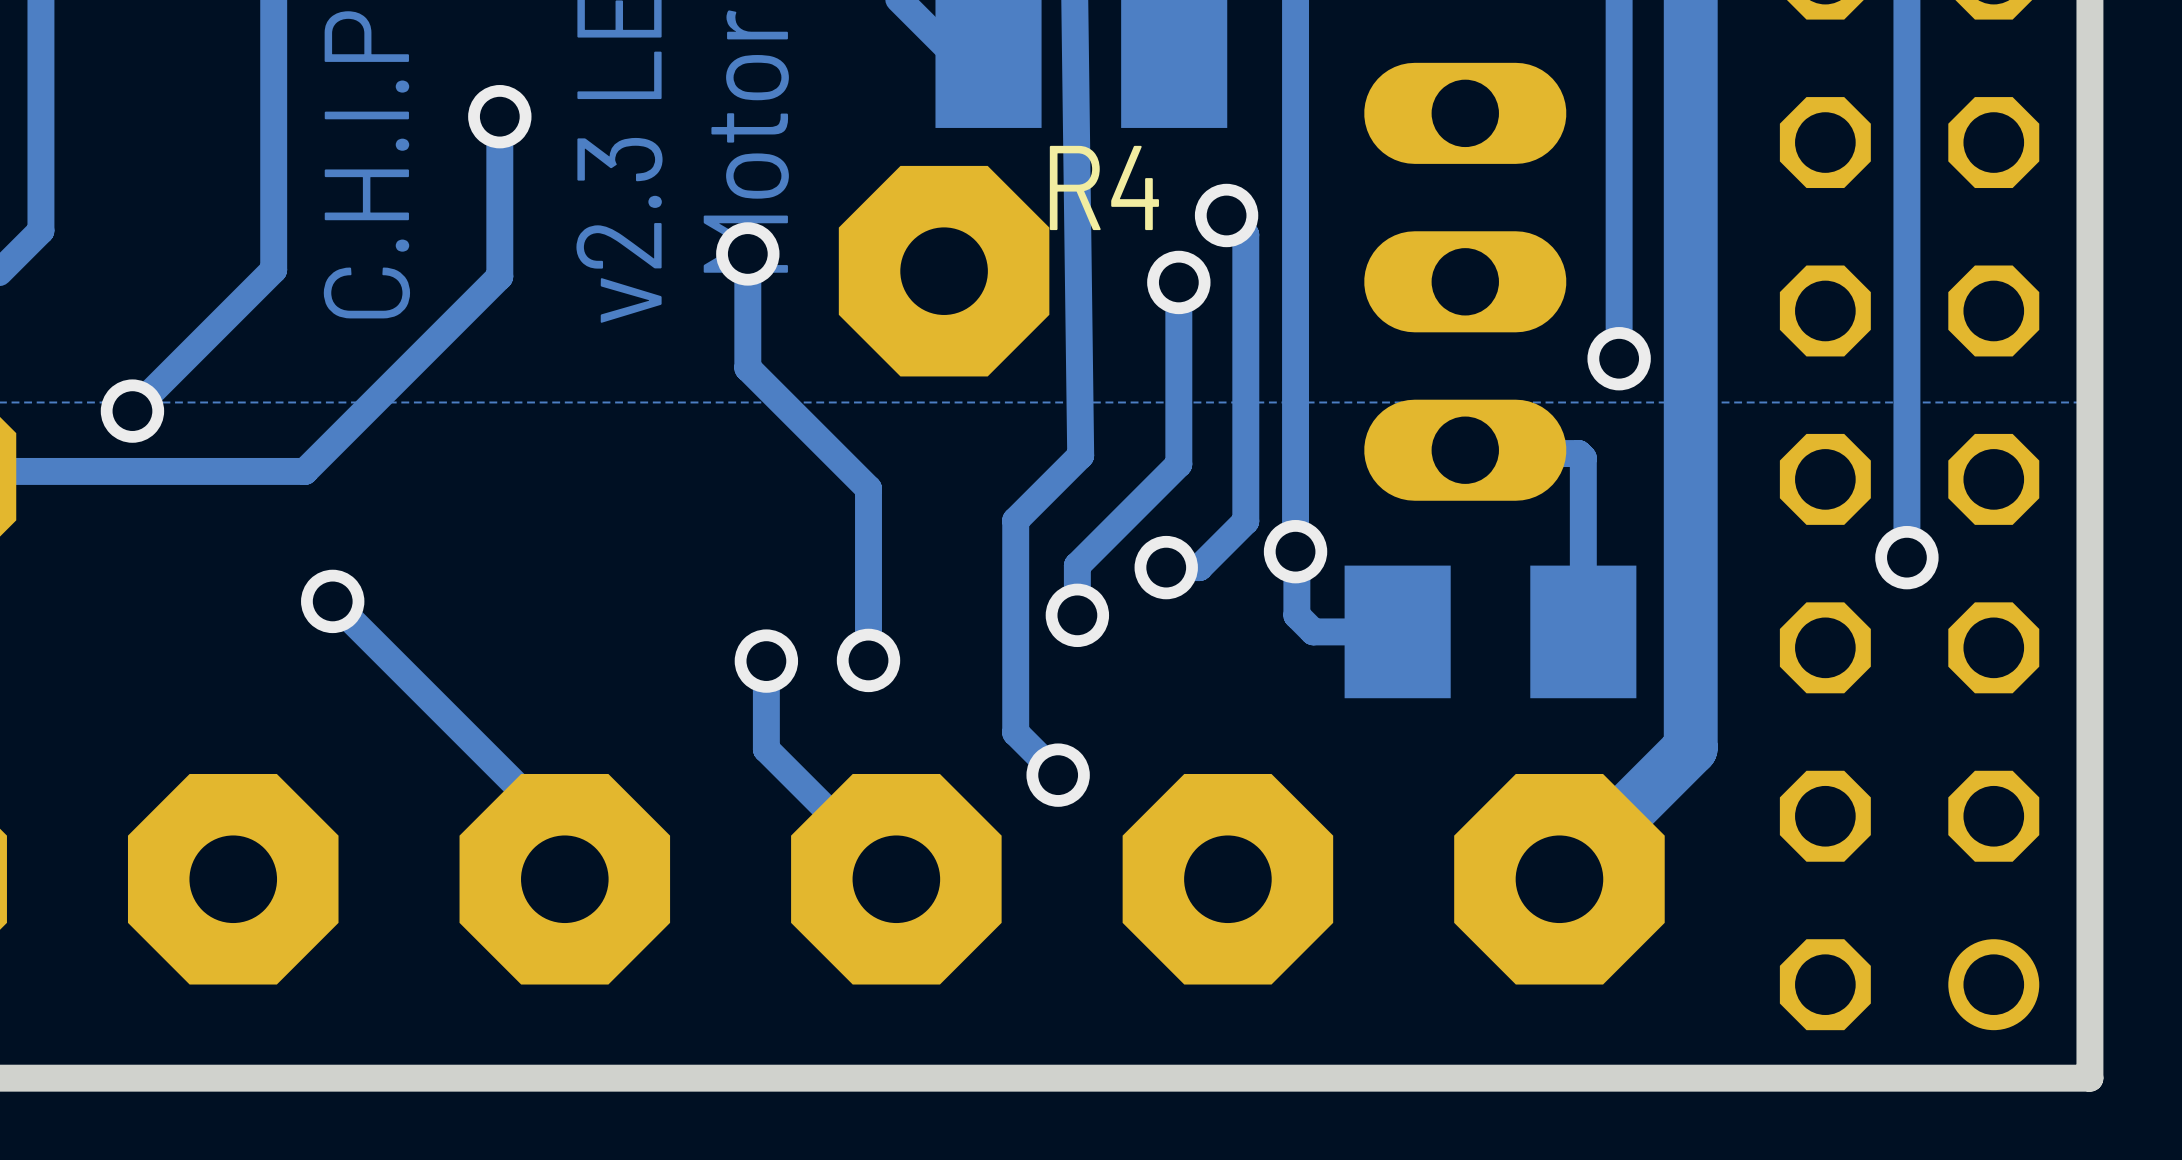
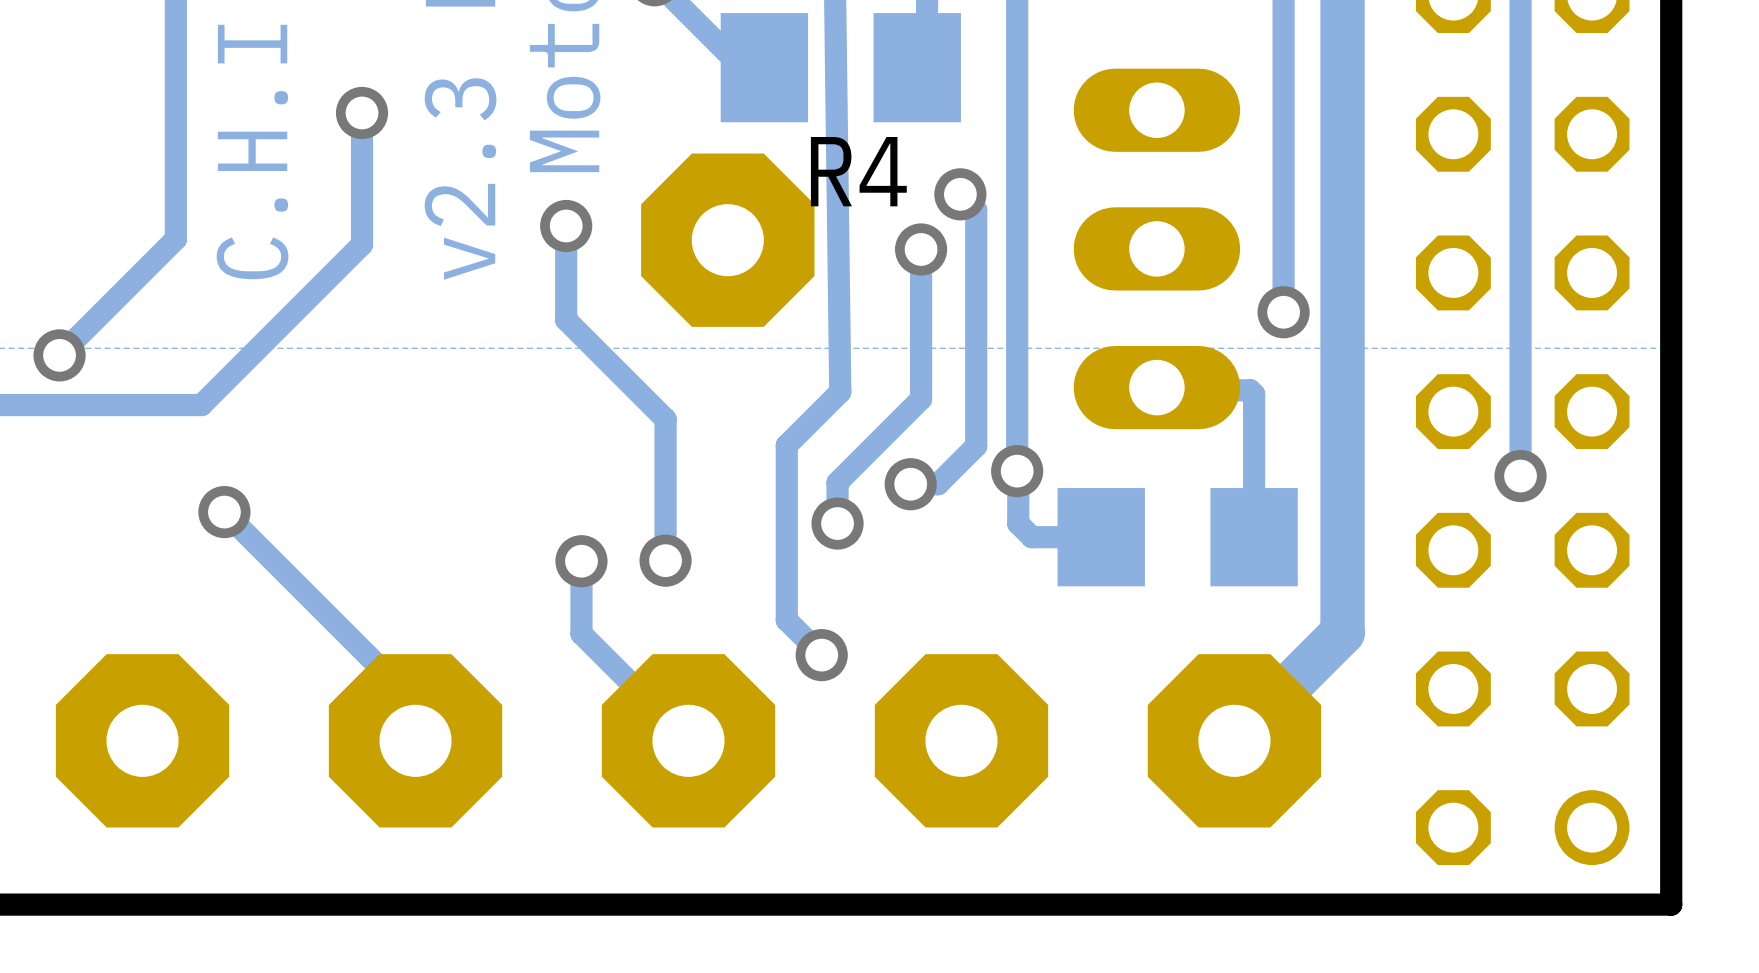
part footprint: [1344, 565, 1637, 699] -> [1057, 488, 1298, 587]

